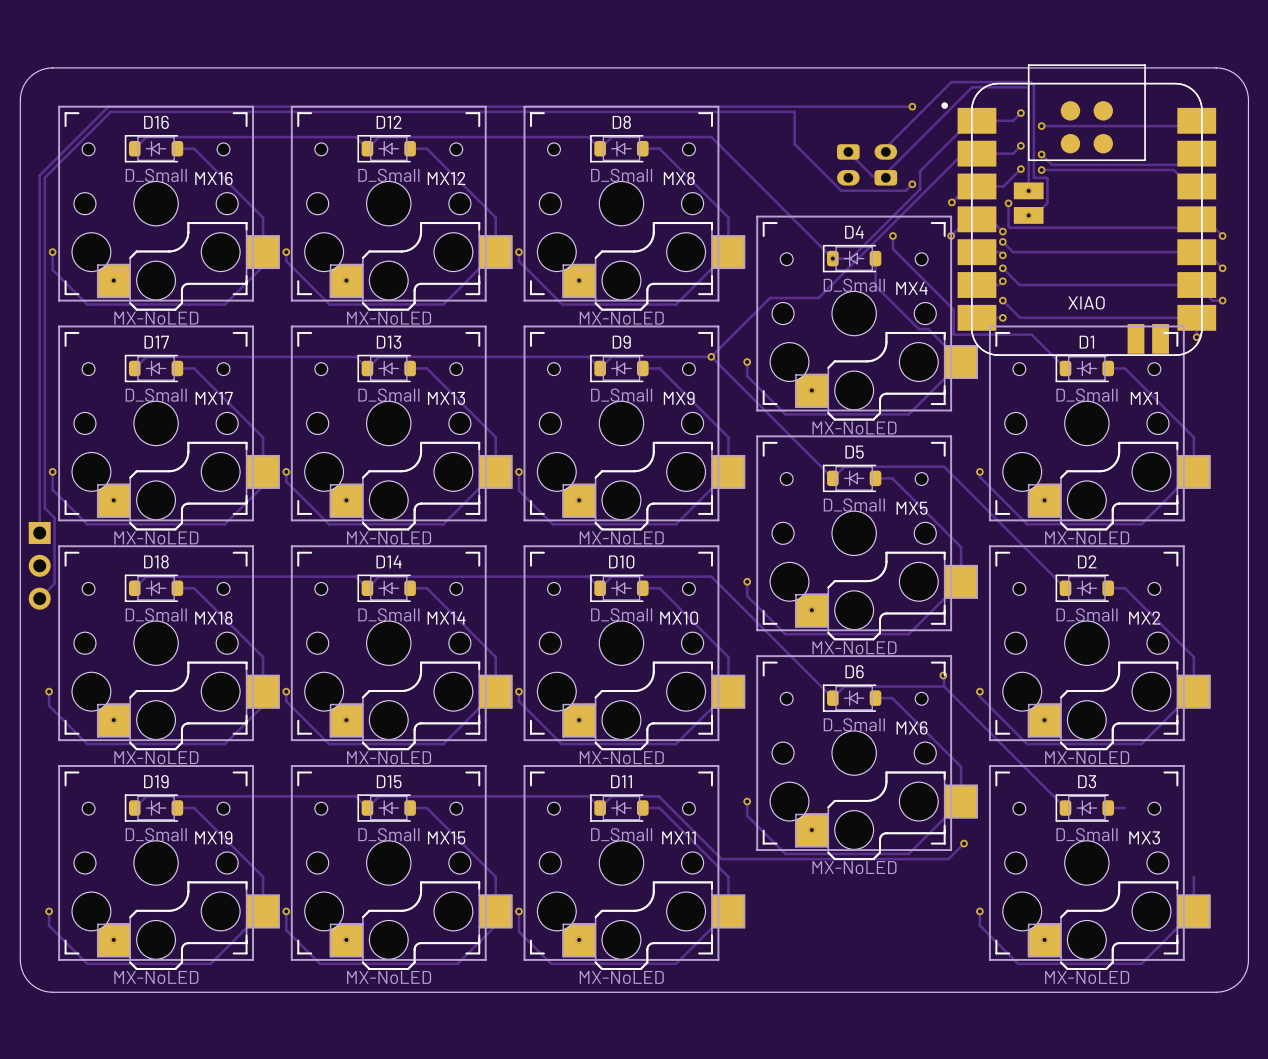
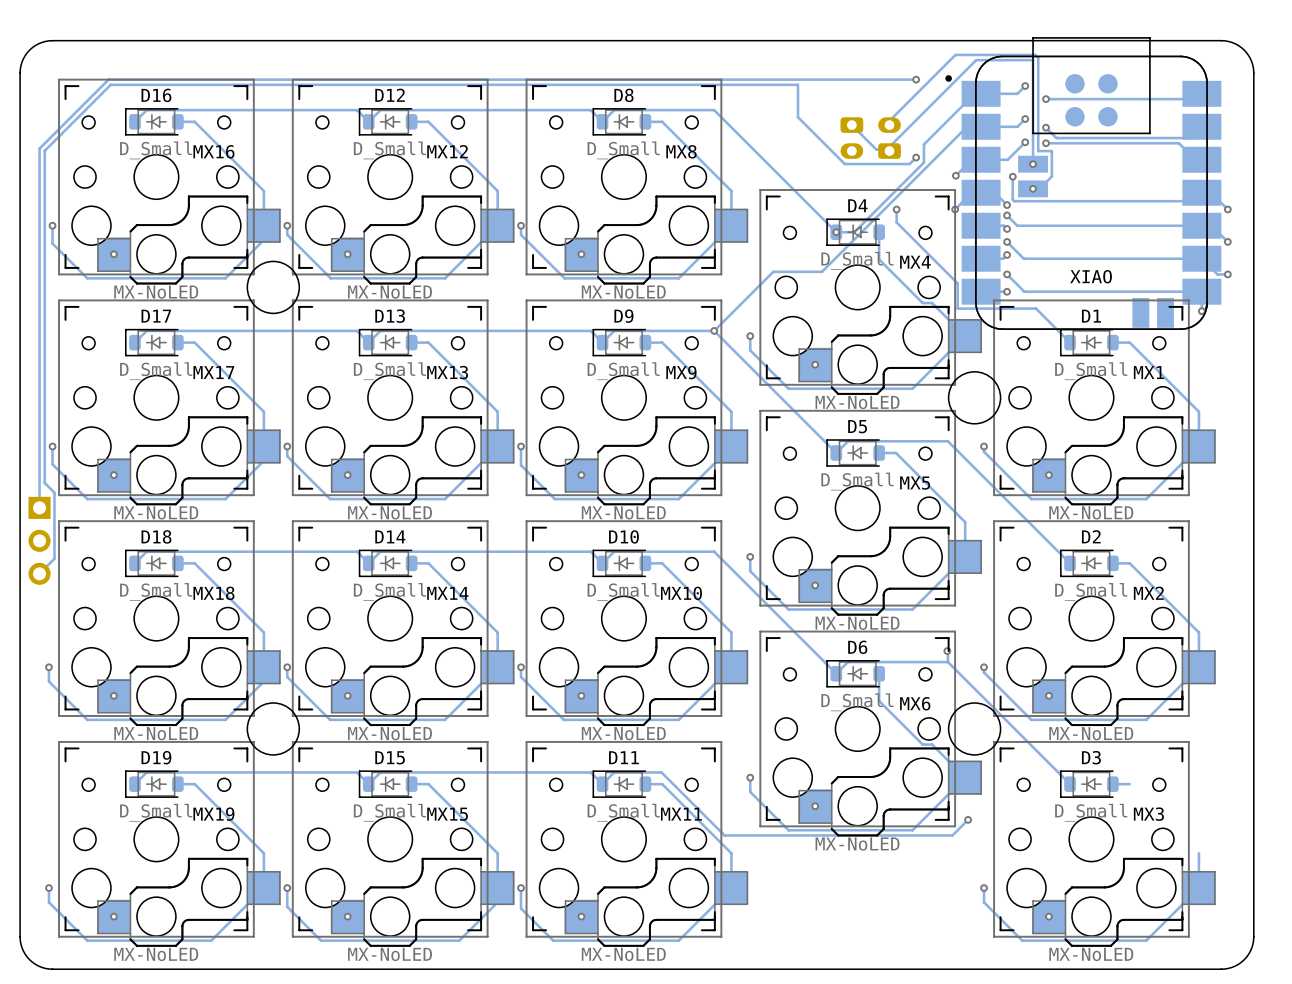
round board edge: none -> [247, 261, 300, 314]
round board edge: none -> [948, 371, 1001, 425]
track: (875, 698) (892, 698) (961, 767) (961, 801) -> (879, 673) (879, 701) (922, 744) (932, 744) (965, 777)
round board edge: none -> [247, 702, 300, 756]
round board edge: none -> [948, 702, 1001, 756]

